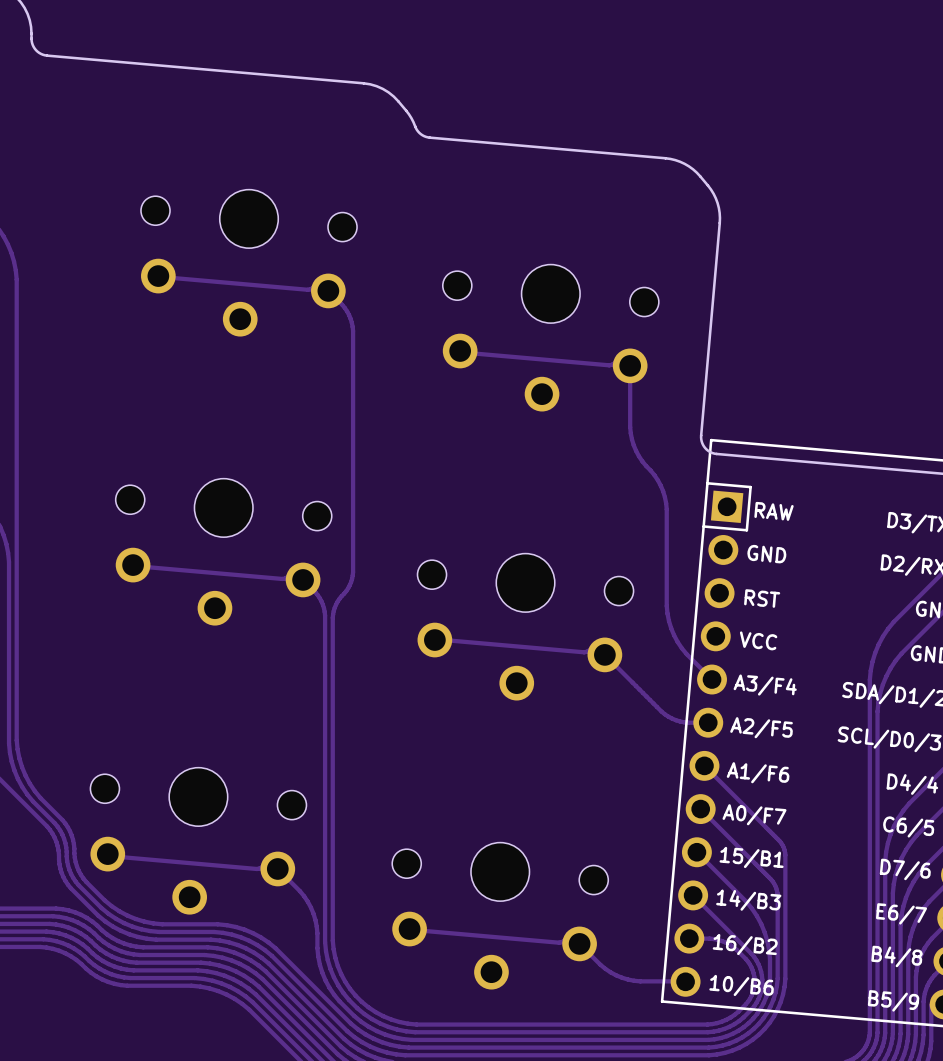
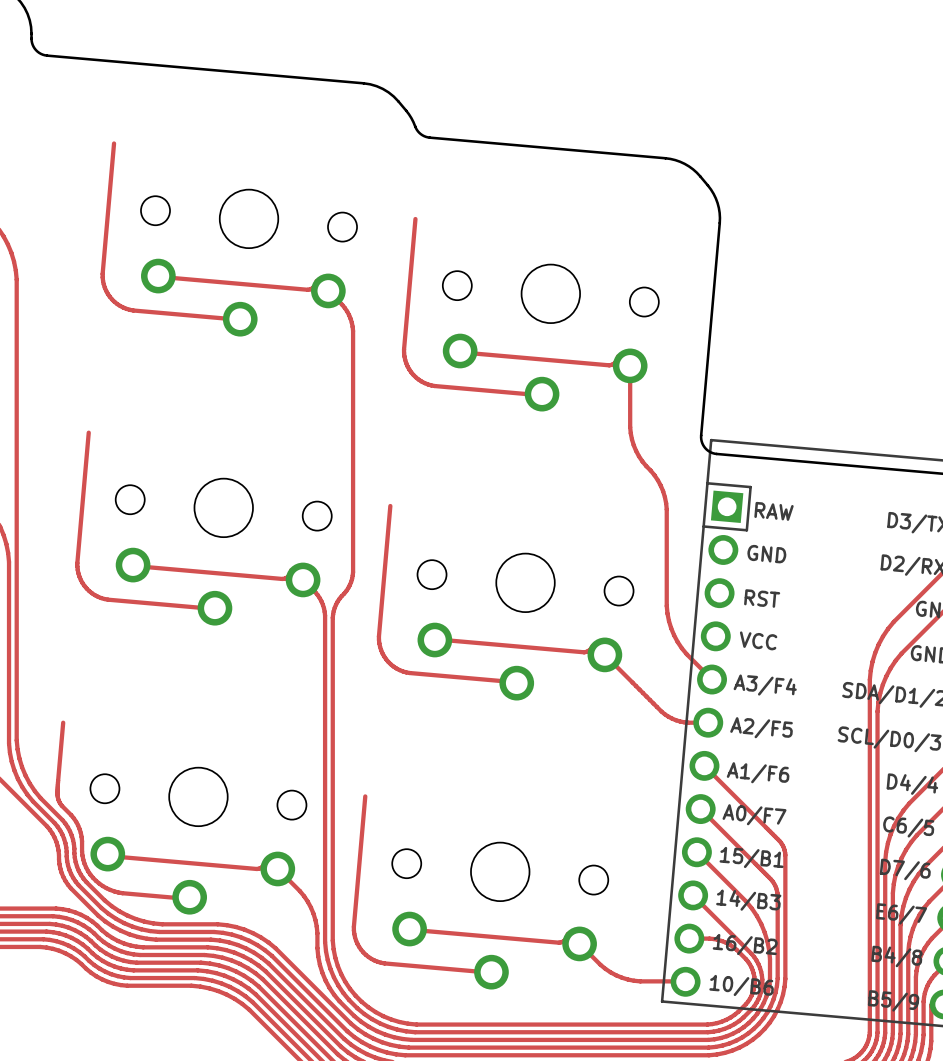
track: none -> (114, 143) (102, 273) (104, 287) (109, 296) (120, 305) (133, 310) (240, 319)
track: none -> (415, 219) (404, 349) (406, 363) (411, 372) (421, 381) (434, 386) (541, 395)
track: none -> (88, 432) (77, 563) (79, 576) (84, 585) (94, 595) (107, 599) (215, 609)
track: none -> (390, 506) (378, 636) (381, 650) (386, 659) (396, 668) (409, 673) (516, 682)
track: none -> (63, 722) (57, 796) (61, 804) (78, 825) (81, 837) (83, 859) (90, 874) (102, 886) (118, 892) (189, 899)
track: none -> (365, 796) (353, 926) (356, 940) (361, 949) (371, 958) (384, 963) (491, 972)

